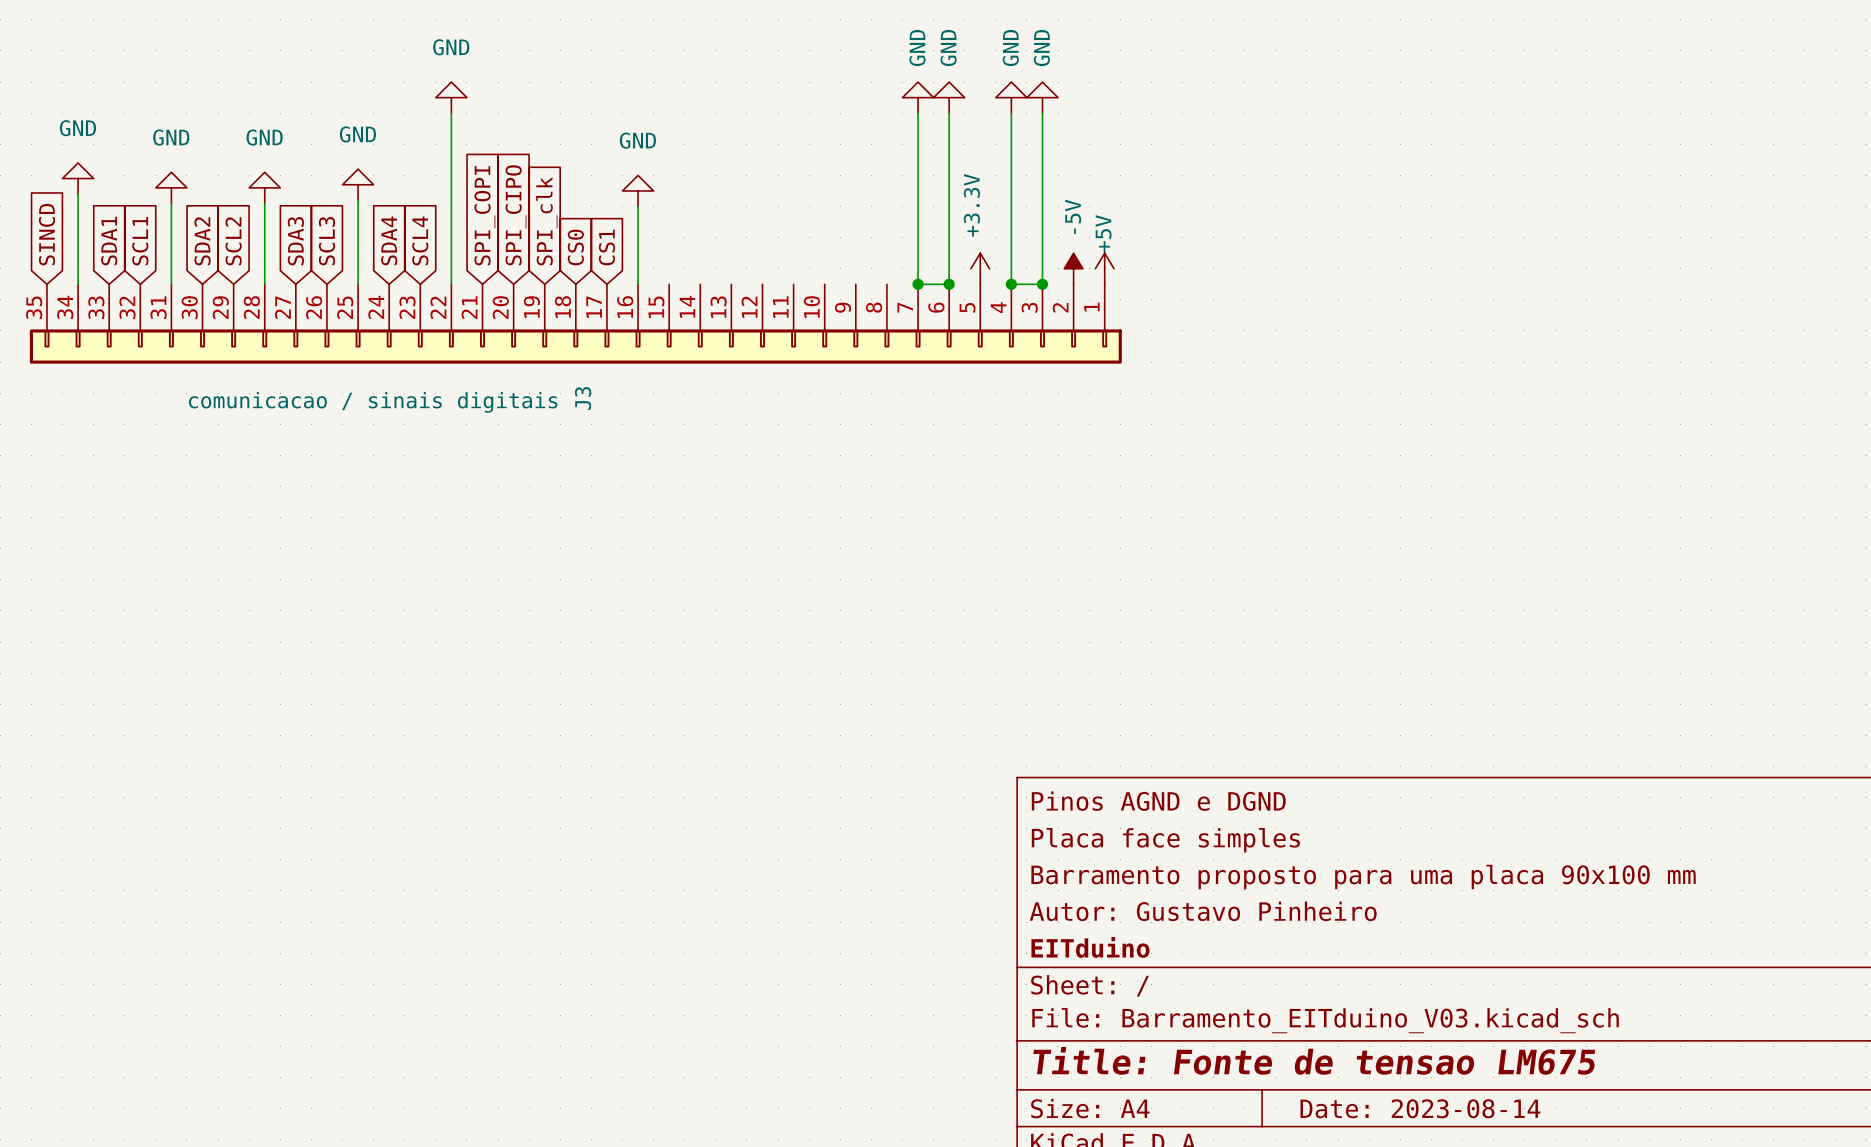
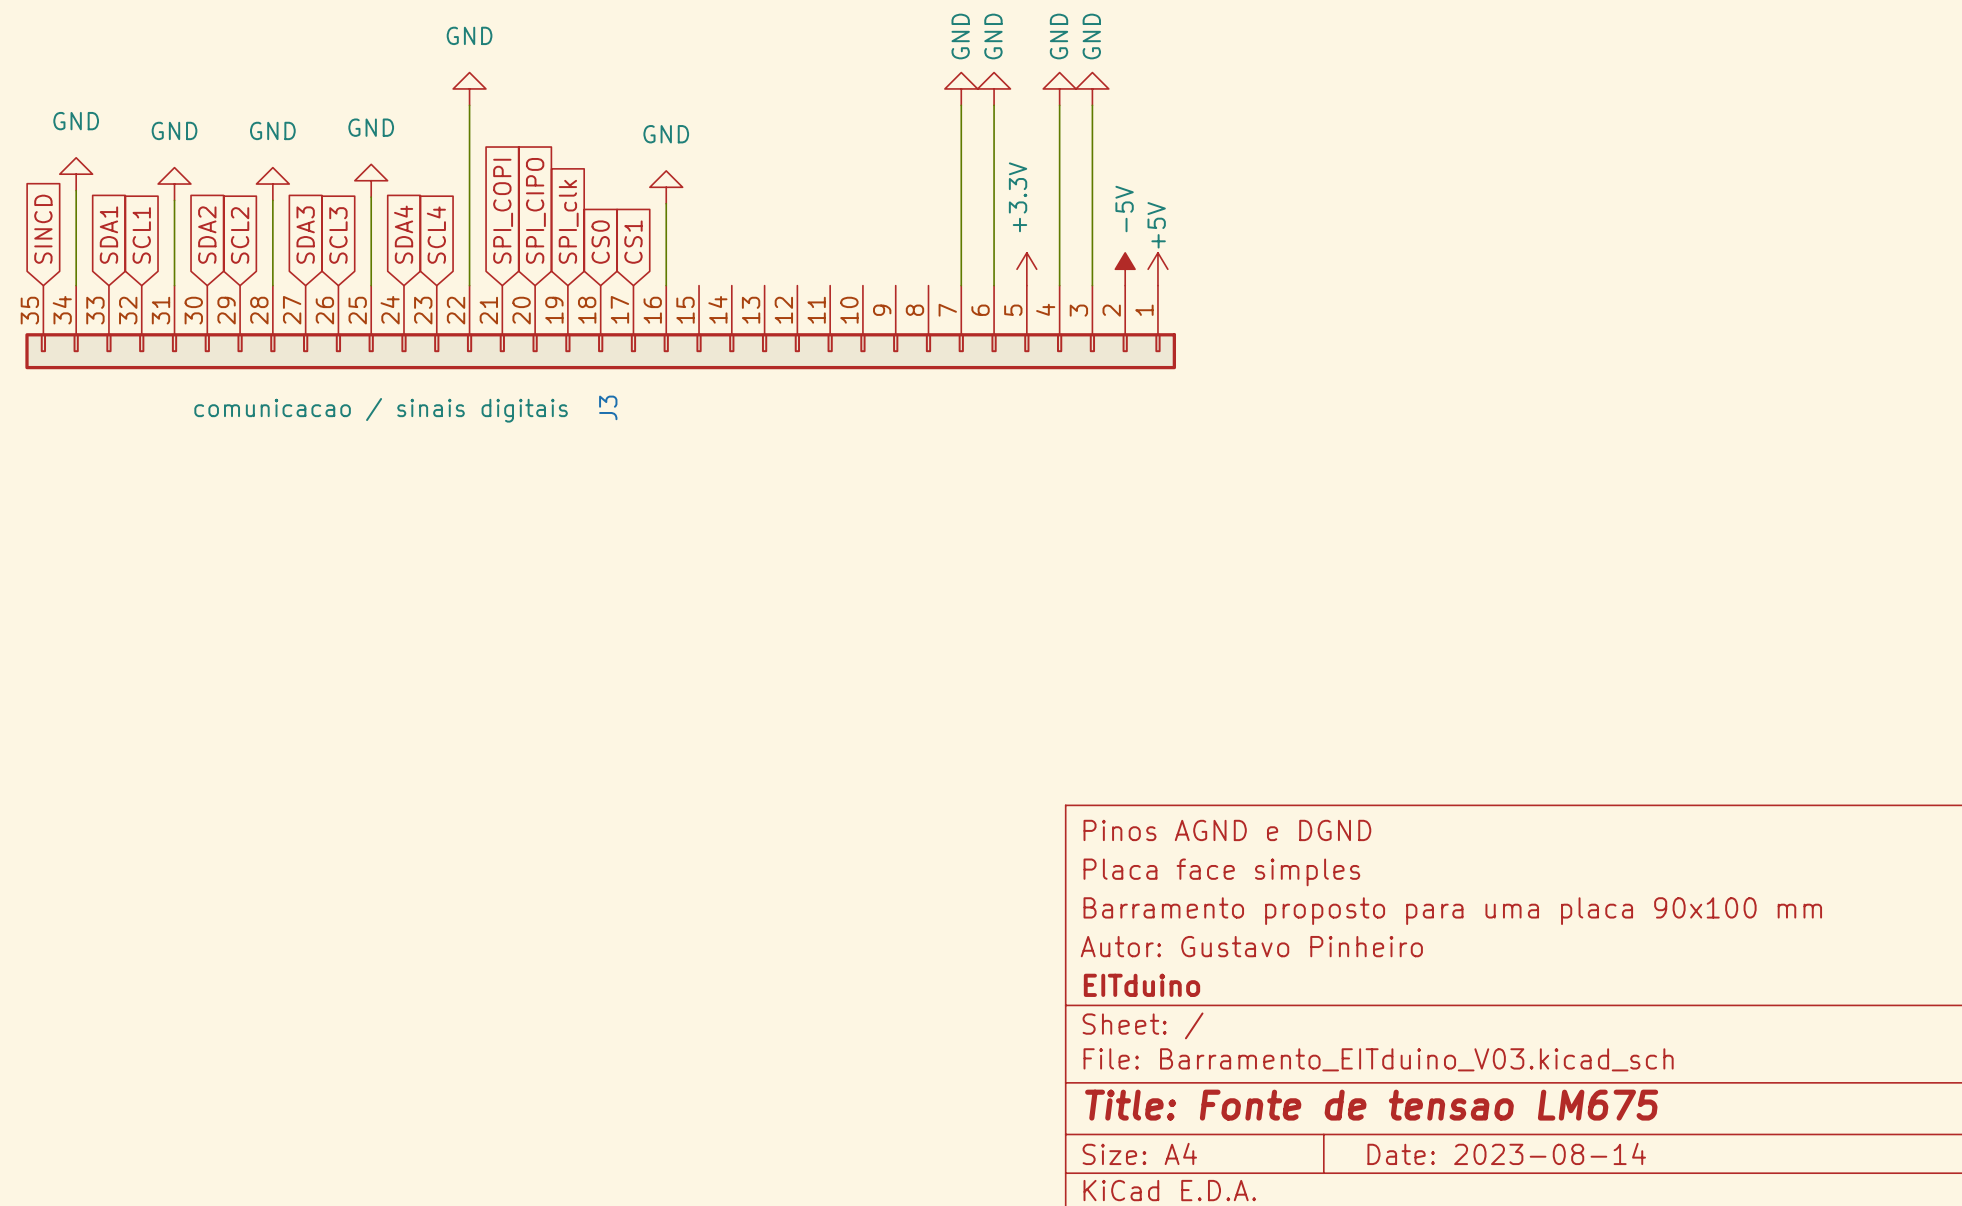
wire: (918, 284) (949, 284) -> none
junction: (918, 284) -> none
junction: (949, 284) -> none
wire: (1011, 284) (1042, 284) -> none
junction: (1011, 284) -> none
junction: (1042, 284) -> none

